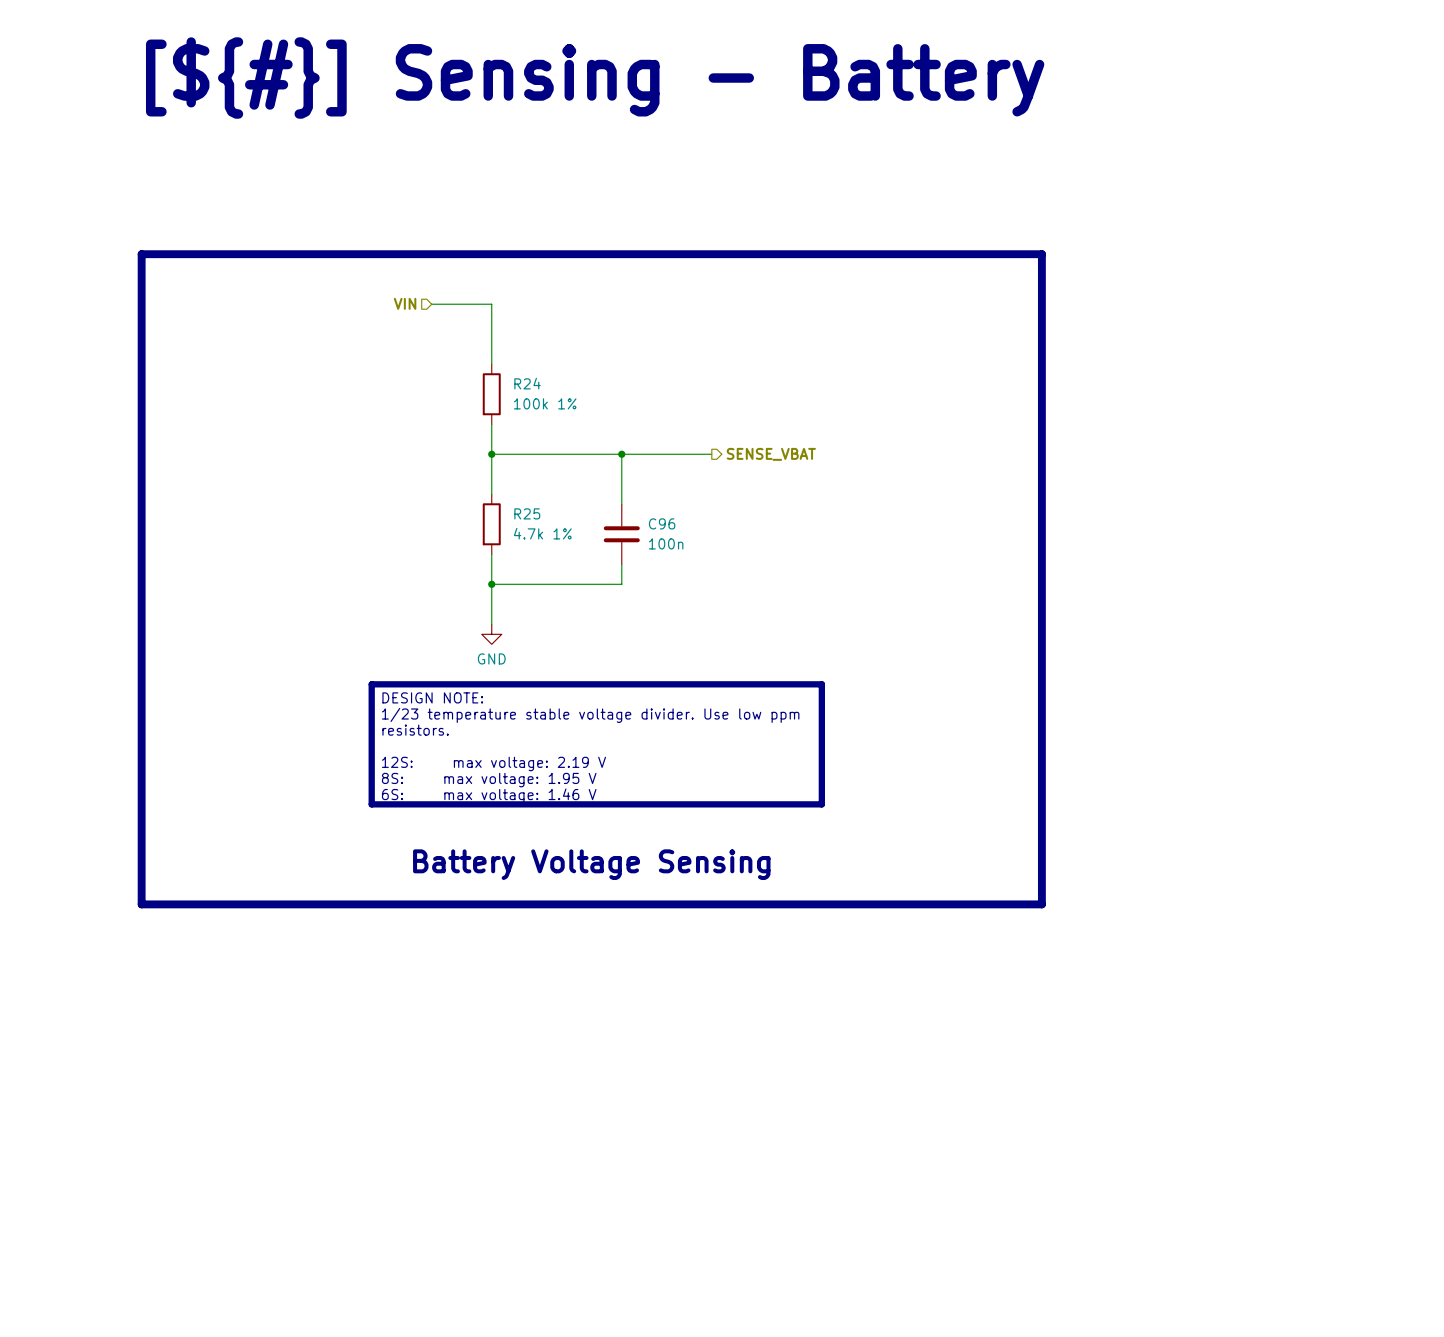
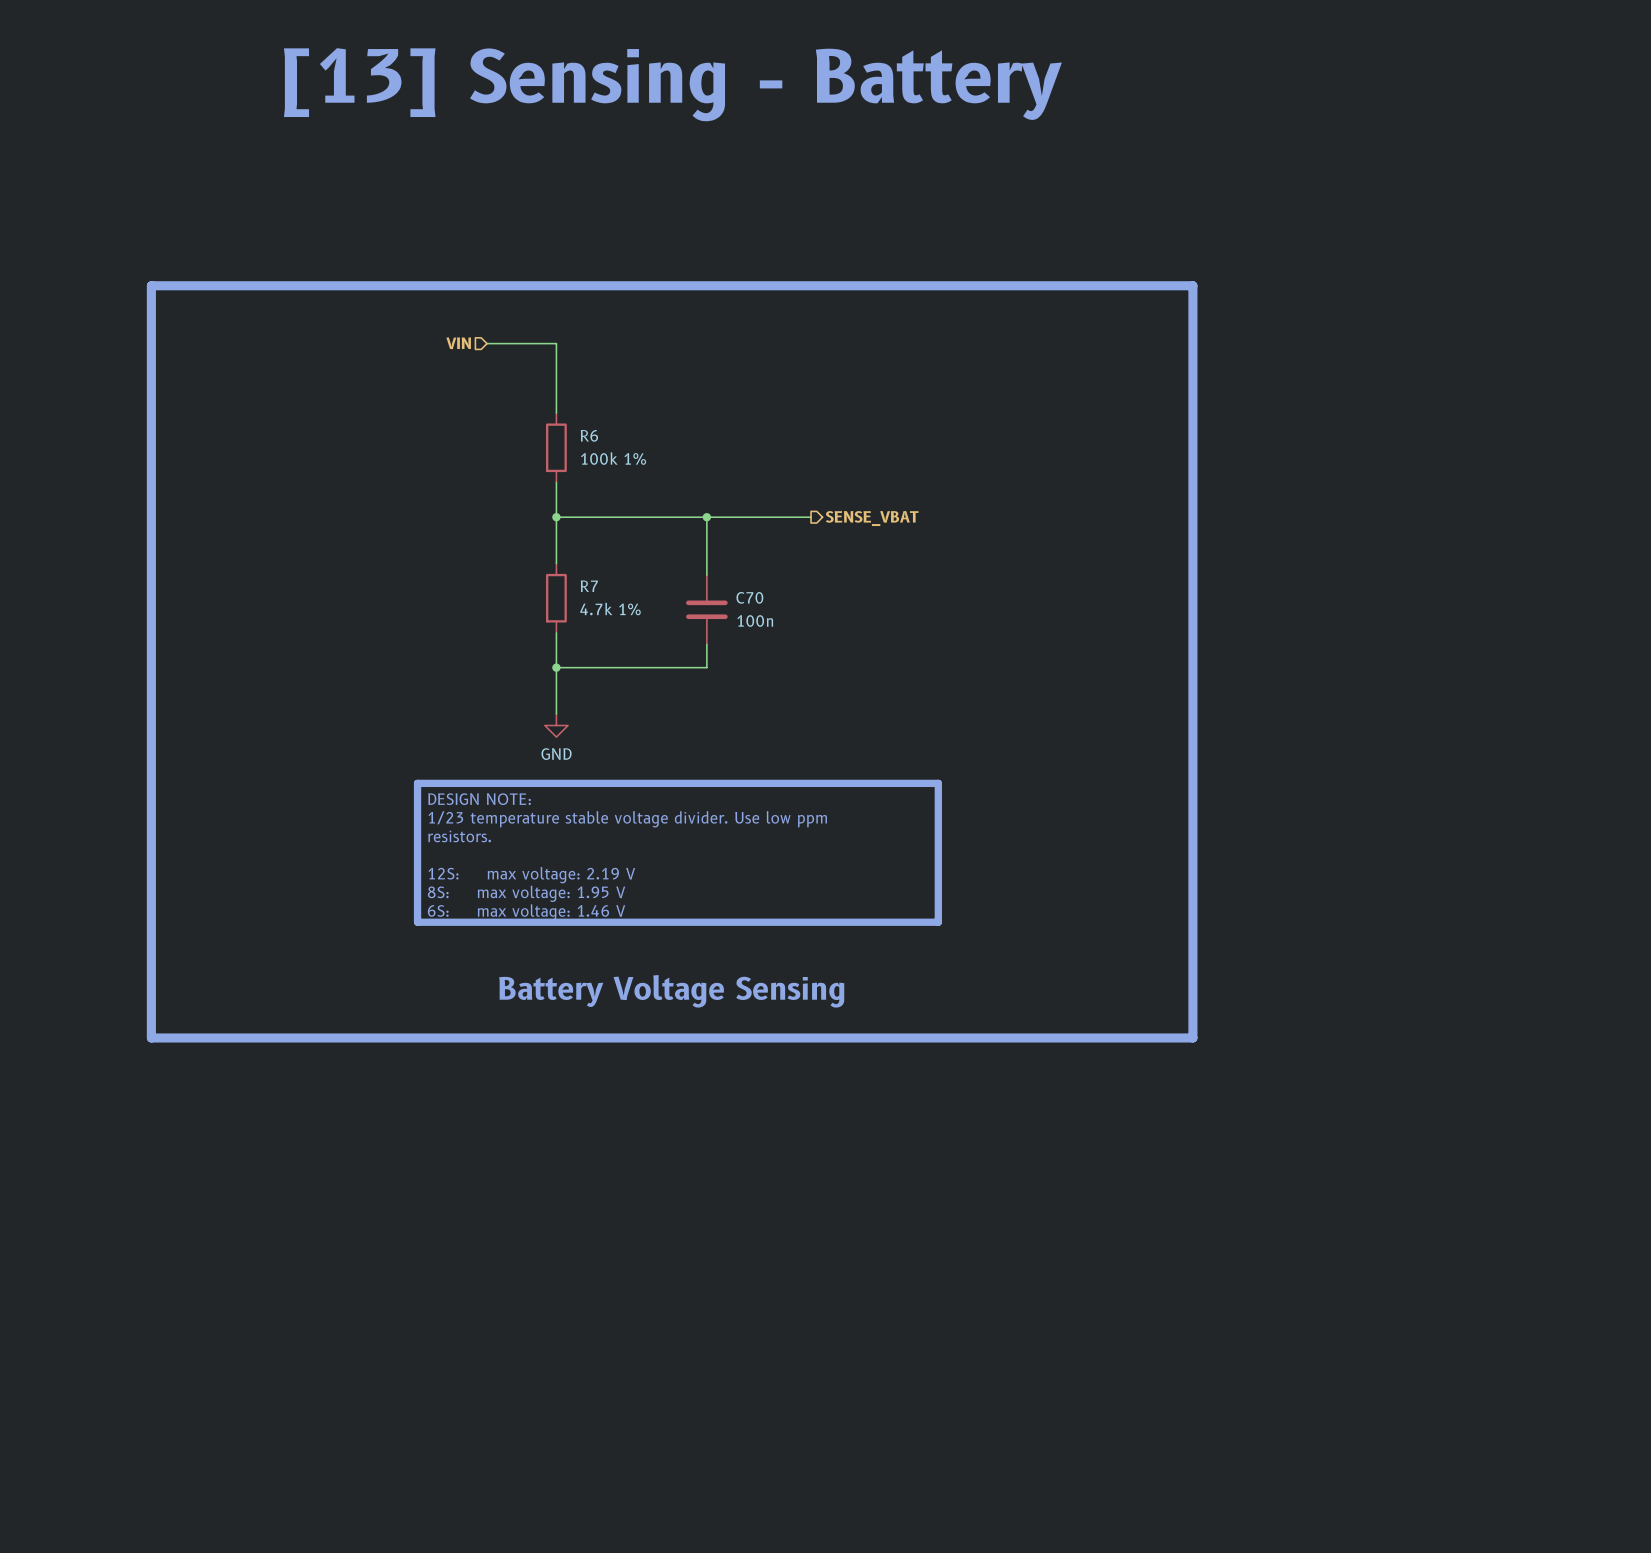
text: [${#}] Sensing - Battery (595, 78) -> [13] Sensing - Battery (672, 84)
R24 name: R24 (527, 383) -> R6 (589, 435)
R25 name: R25 (527, 513) -> R7 (589, 586)
C96 name: C96 (662, 523) -> C70 (749, 597)

